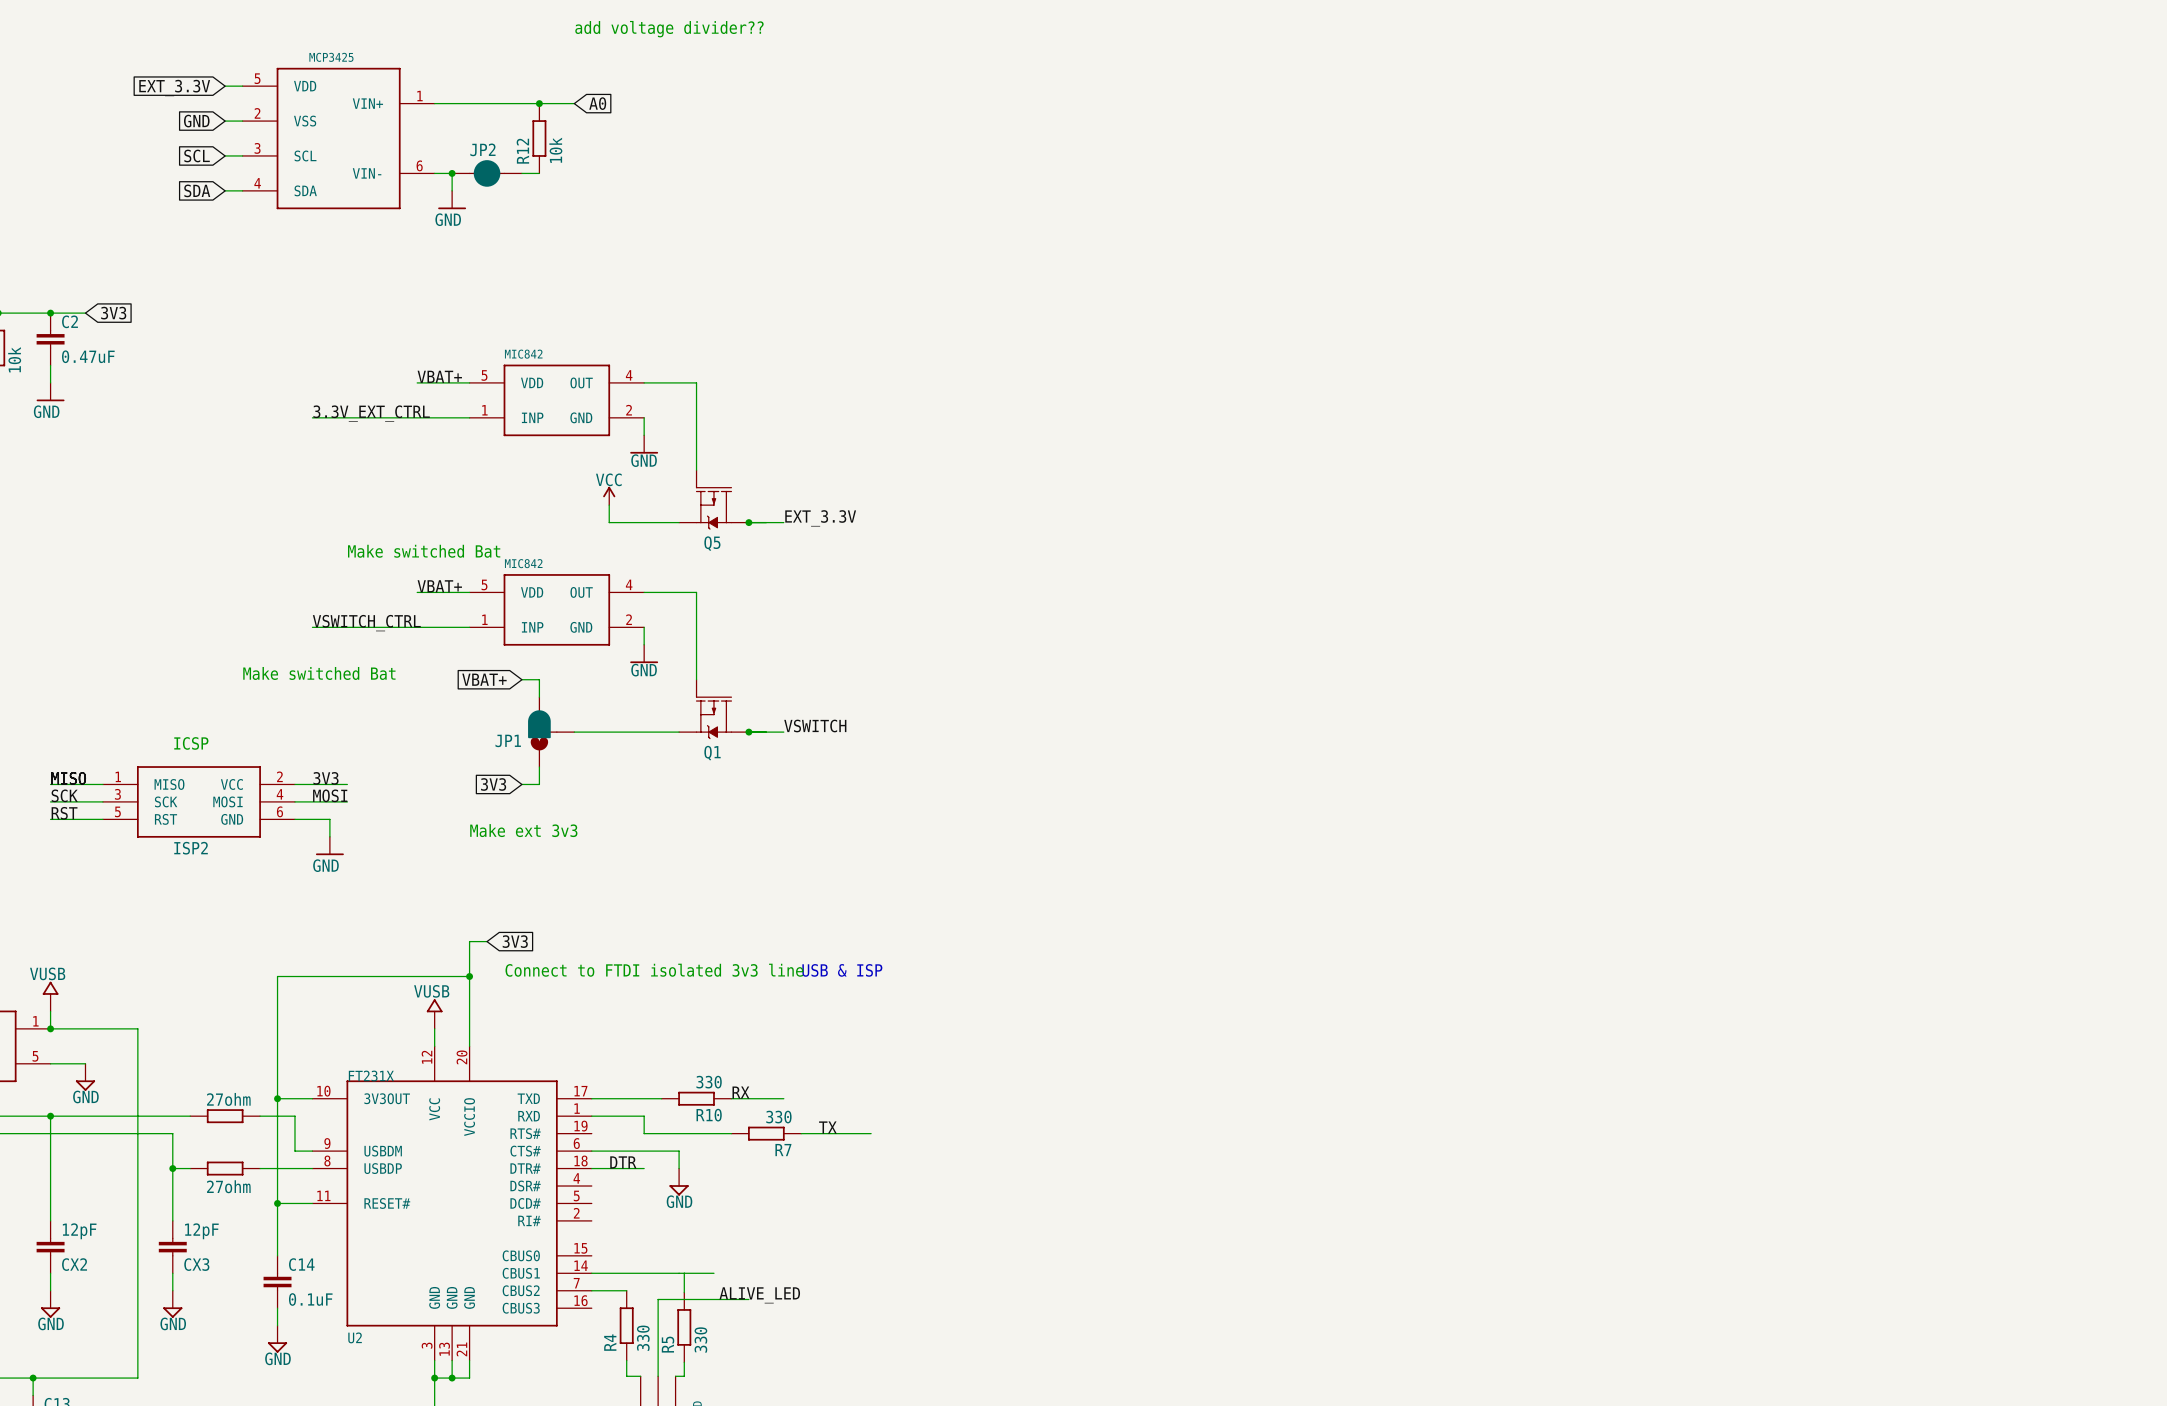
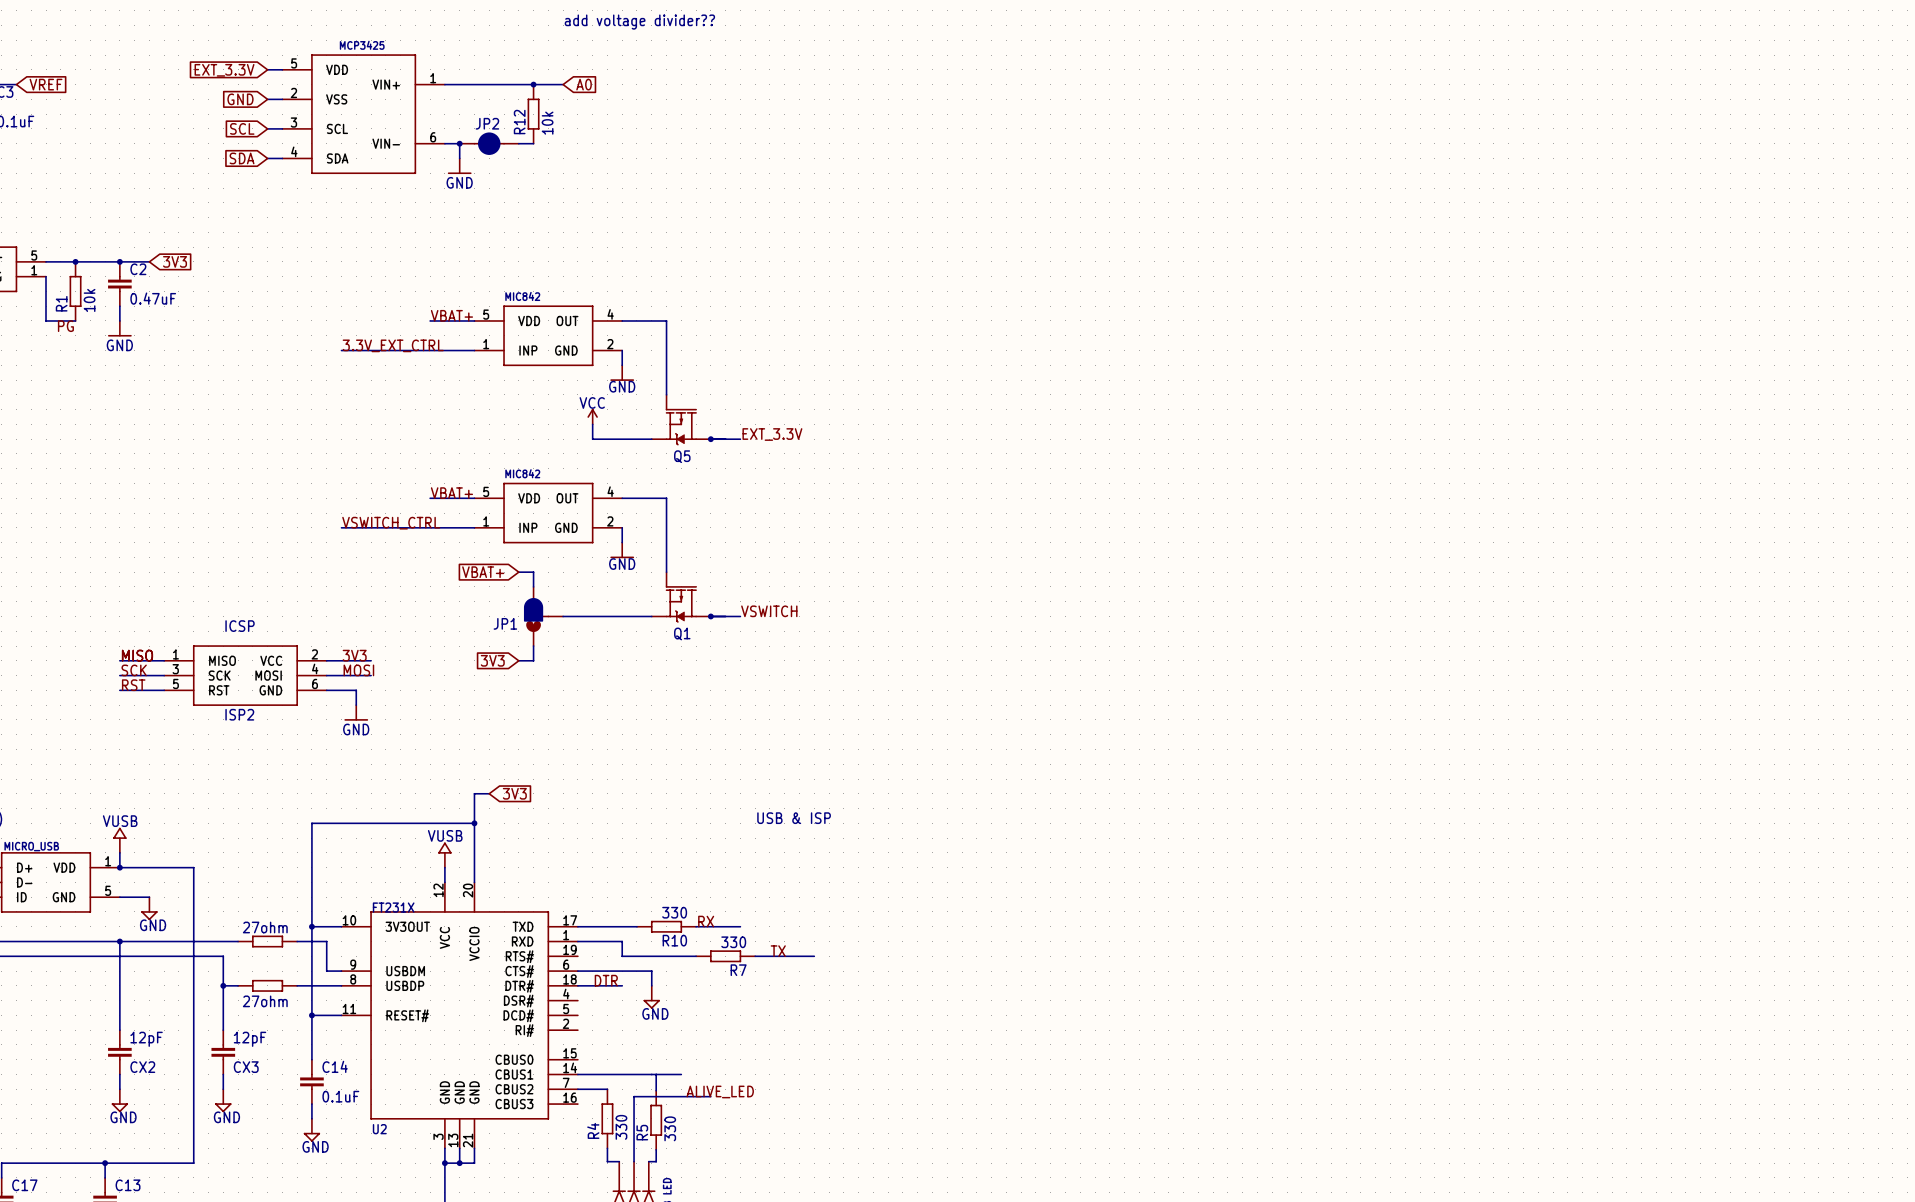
text: Make switched Bat (424, 551) -> none
text: Make switched Bat (319, 673) -> none
text: Make ext 3v3 (523, 830) -> none
text: Connect to FTDI isolated 3v3 line (654, 970) -> none

